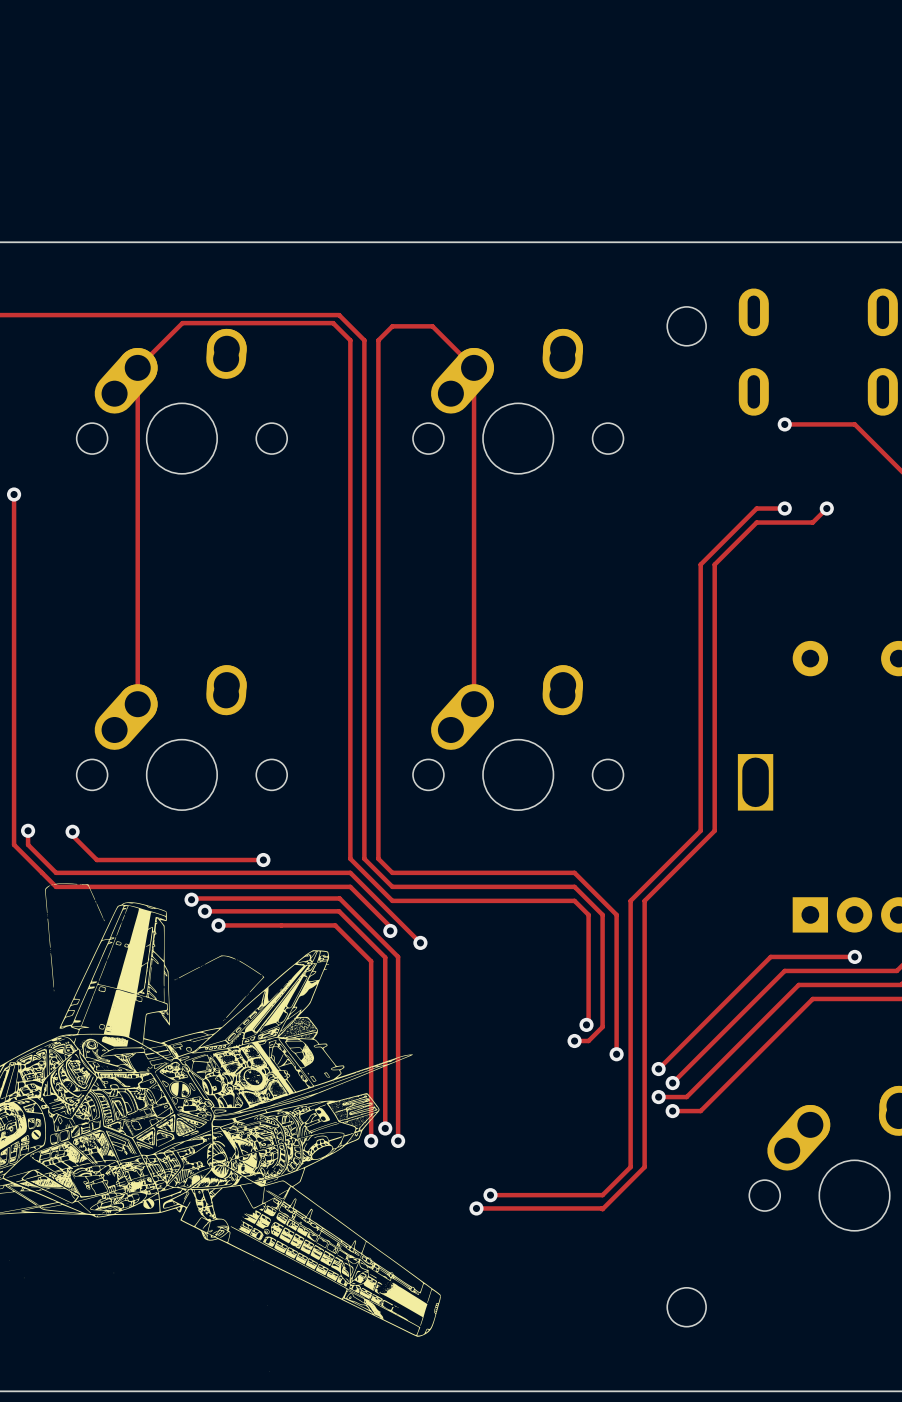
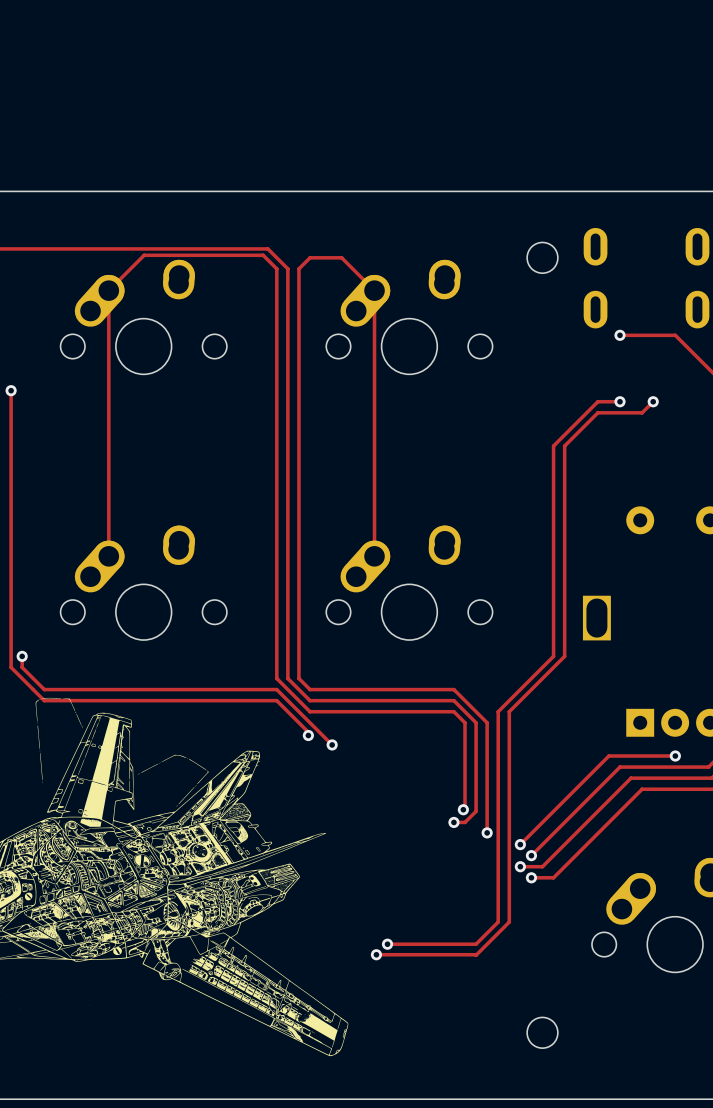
track: (72, 831) (72, 835) (96, 860) (263, 860) -> none
via: (72, 831) -> none
via: (263, 860) -> none
track: (191, 899) (339, 898) (398, 956) (398, 1140) -> none
via: (191, 899) -> none
track: (204, 911) (339, 911) (385, 957) (385, 1128) -> none
via: (204, 911) -> none
track: (218, 925) (335, 925) (371, 961) (371, 1140) -> none
via: (218, 925) -> none
via: (385, 1128) -> none
via: (371, 1140) -> none
via: (398, 1140) -> none

